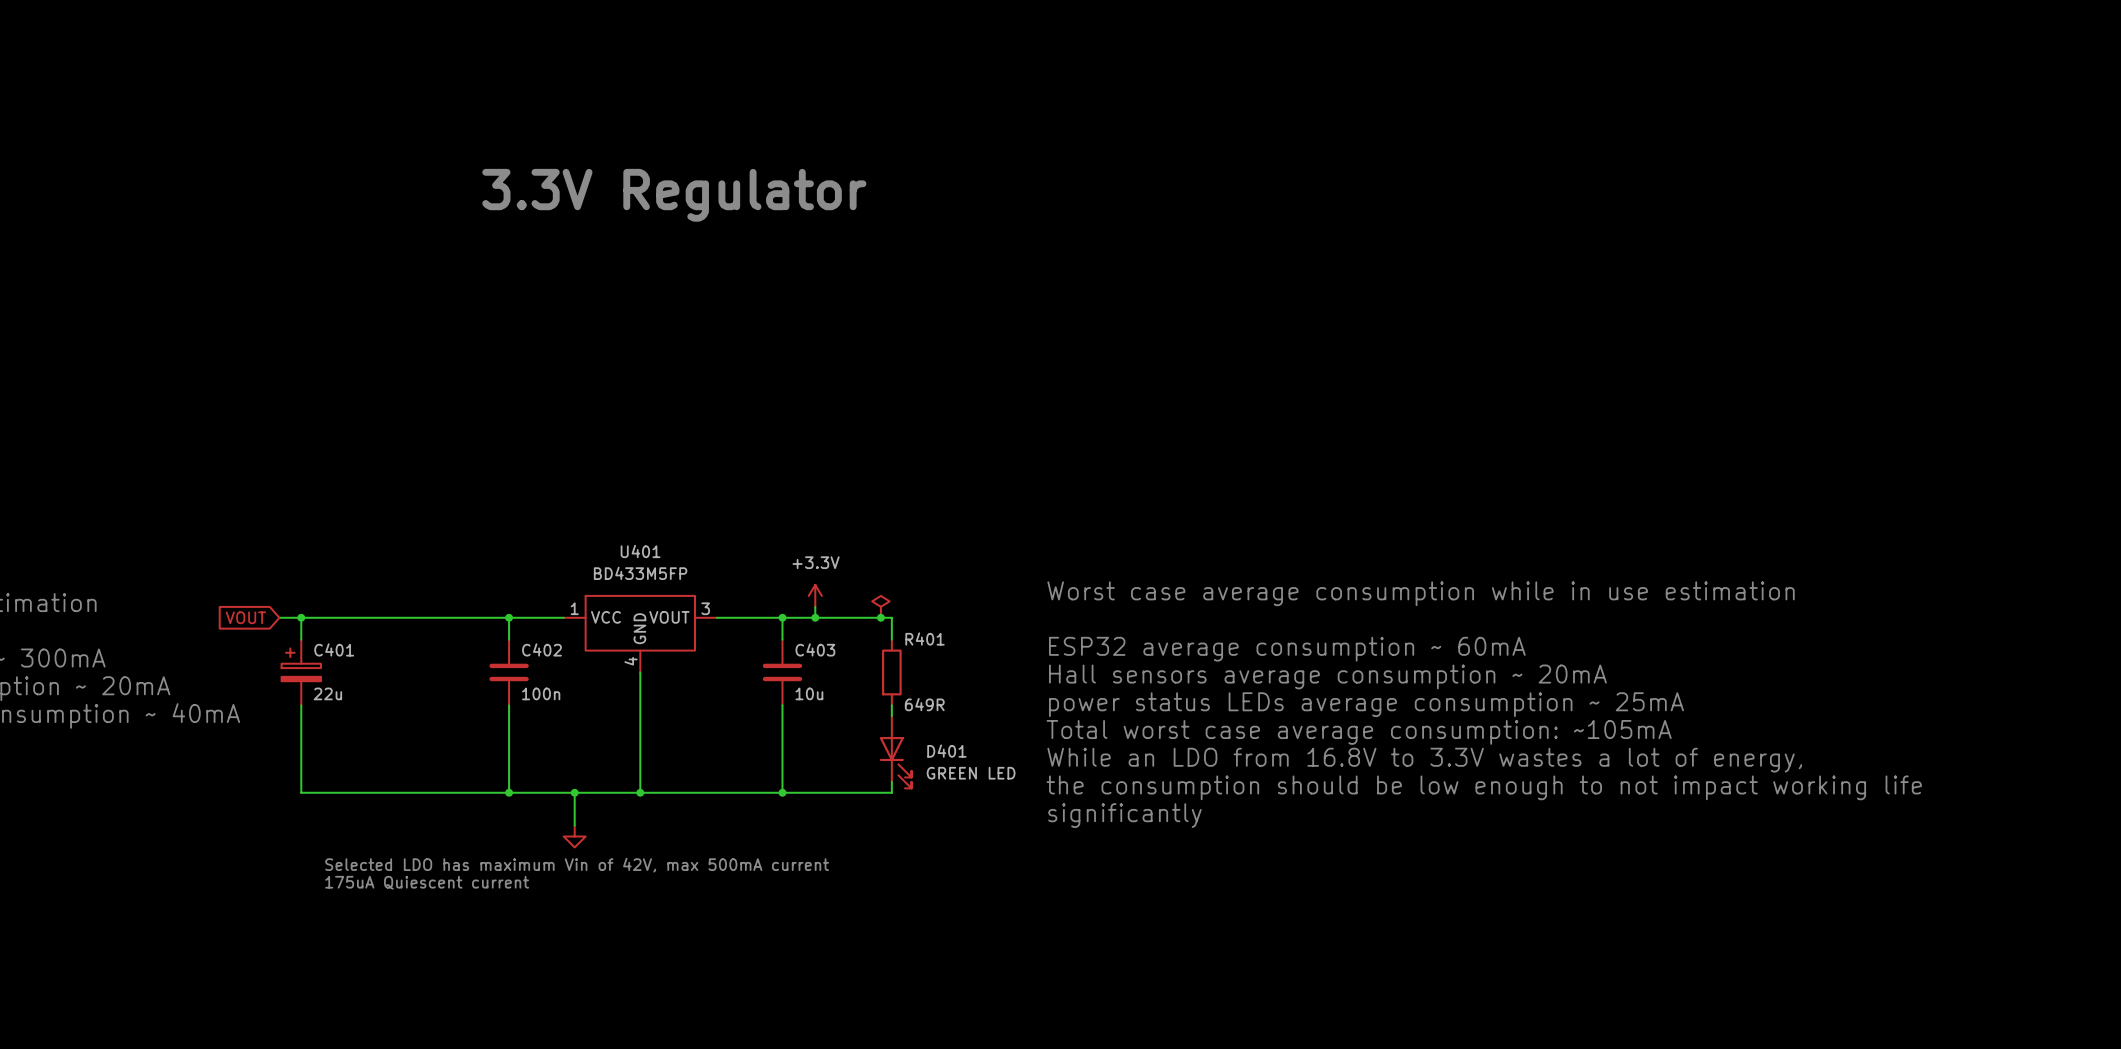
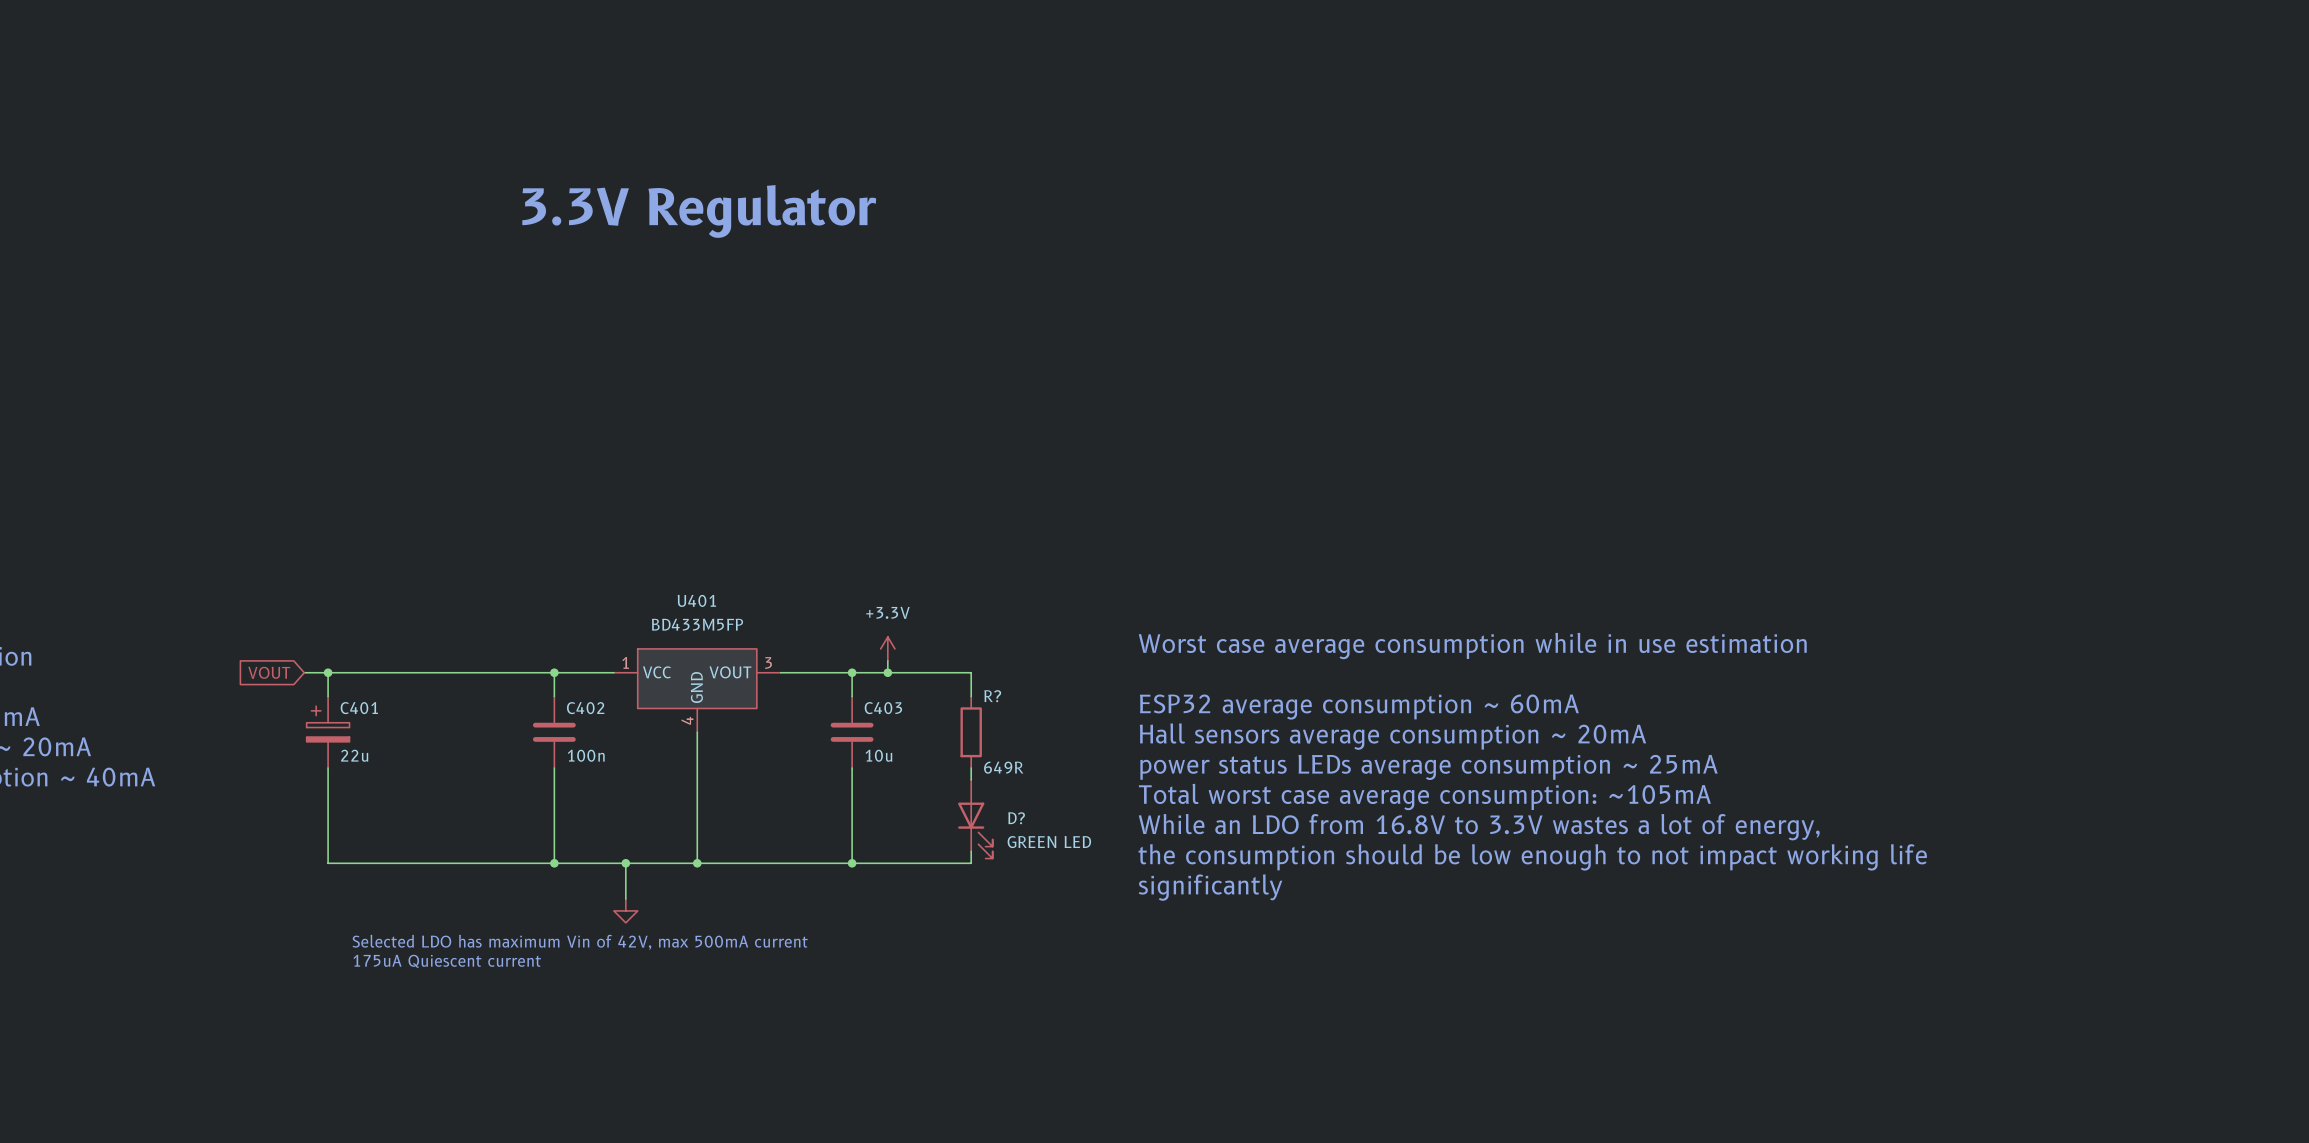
power symbol: (880, 606) -> none
junction: (880, 617) -> none
R401 name: R401 (925, 638) -> R? (992, 696)
D401 name: D401 (946, 751) -> D? (1016, 818)

